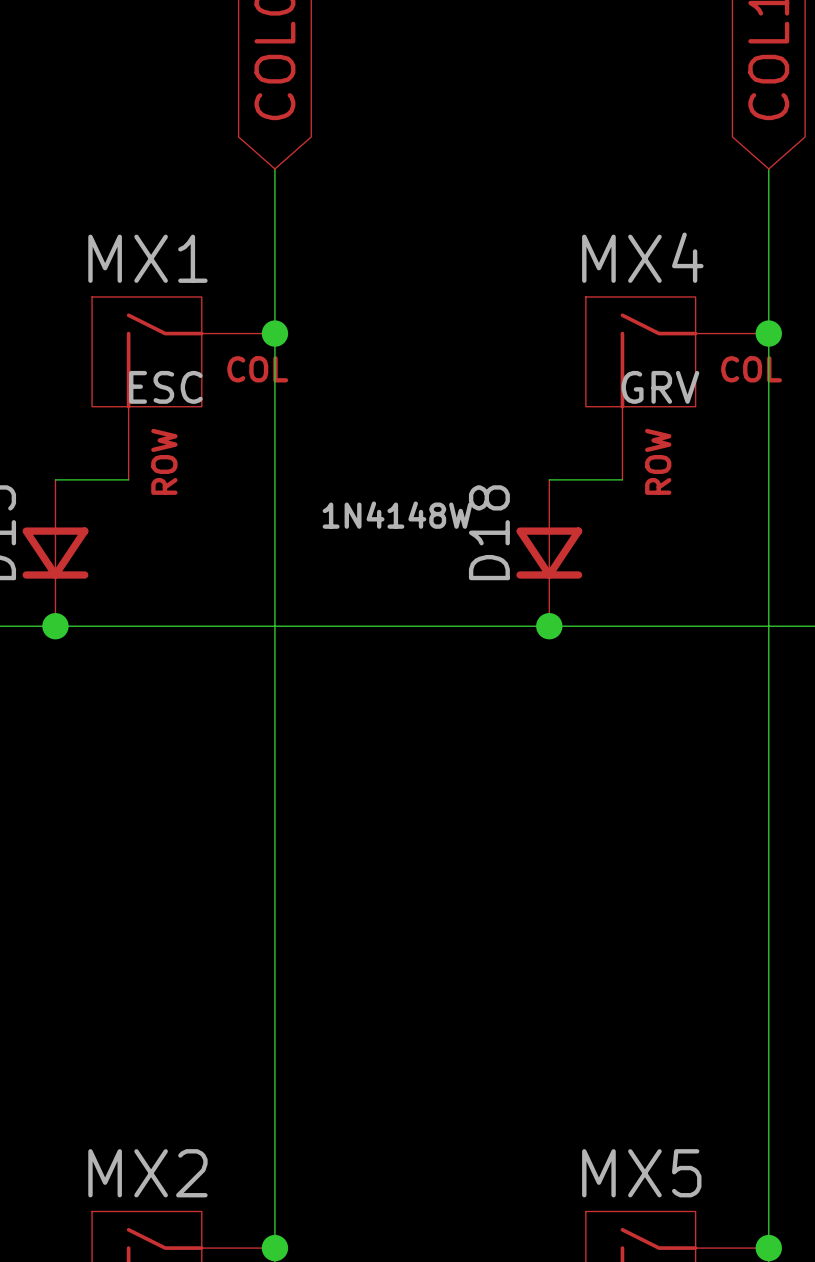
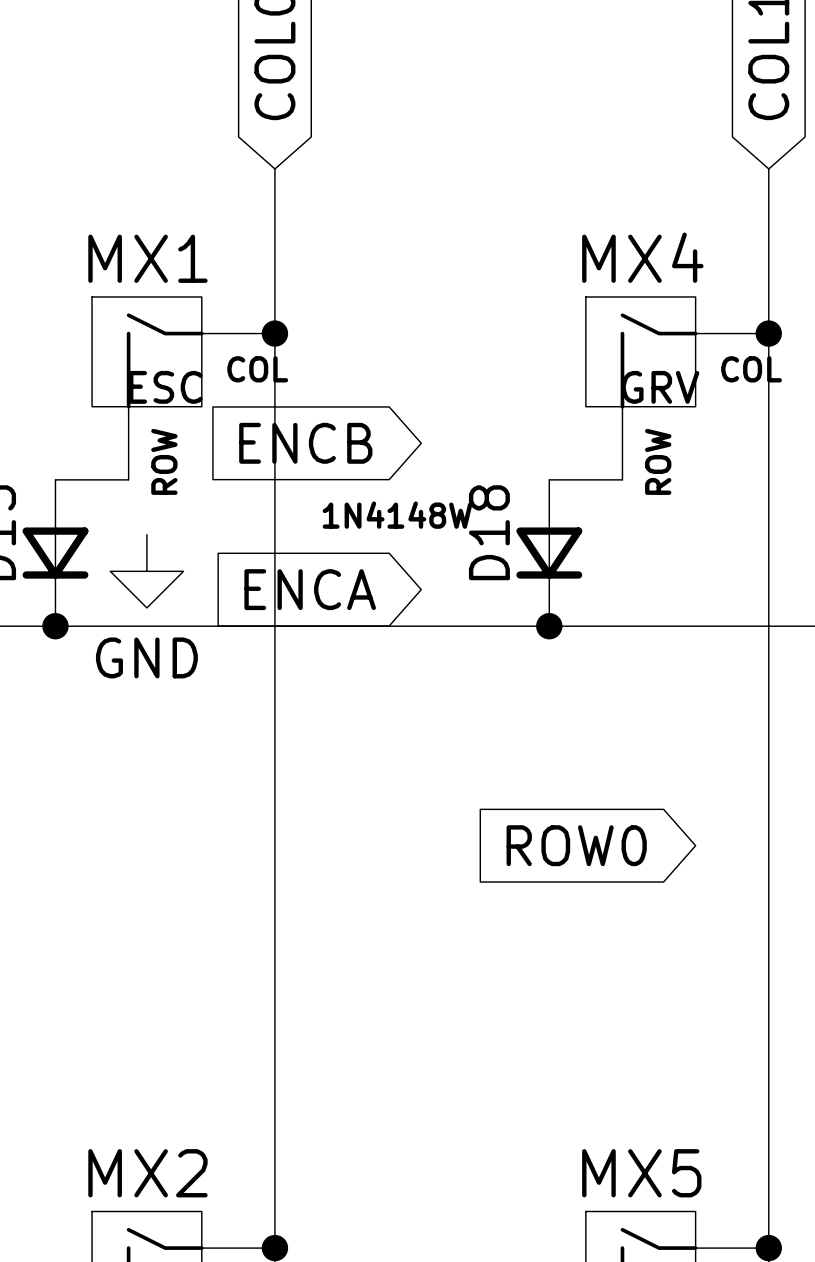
global label: none -> ENCB (305, 443)
power symbol: none -> GND (146, 571)
global label: none -> ENCA (310, 589)
global label: none -> ROW0 (576, 845)

